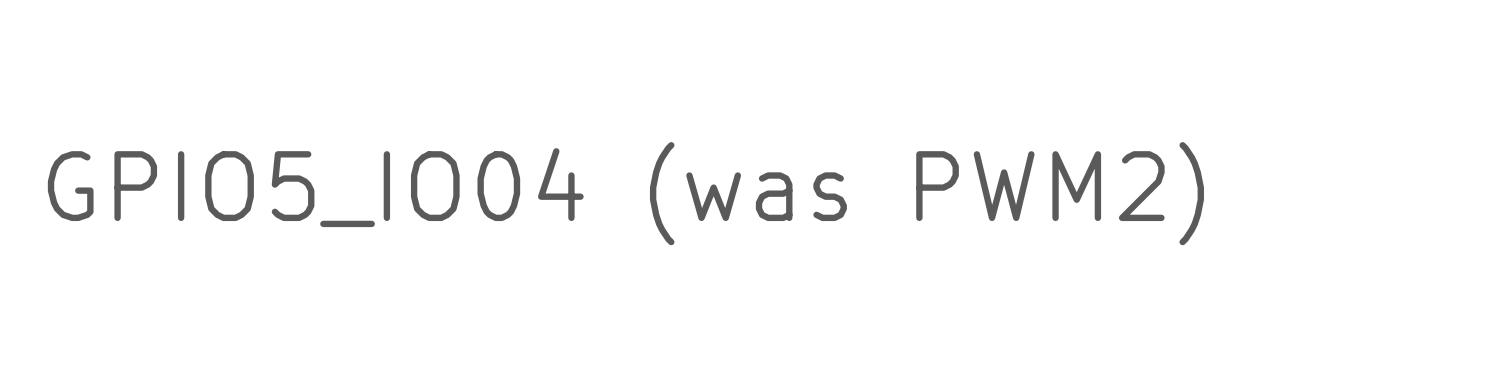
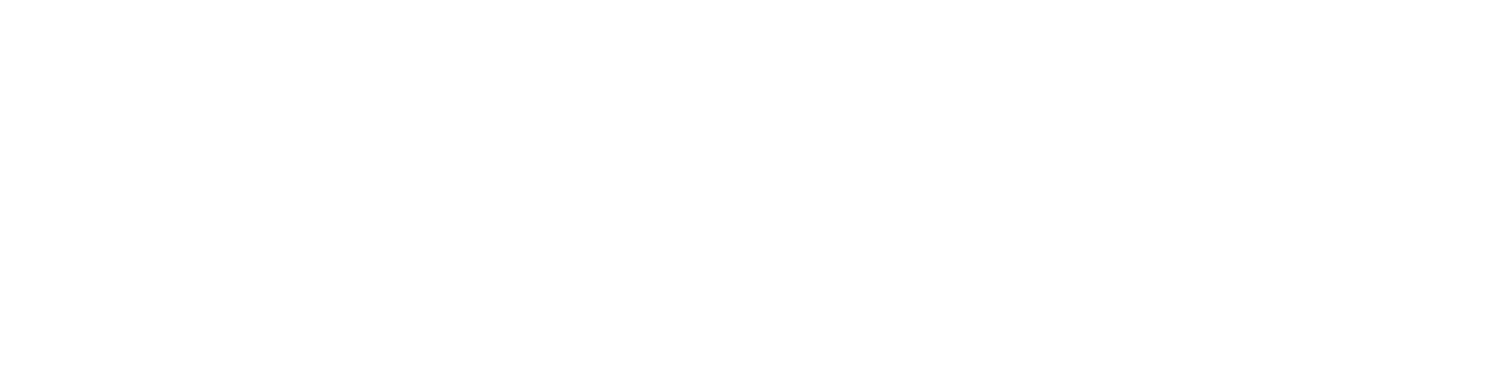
text: GPIO5_IO04 (was PWM2) (625, 193) -> none

